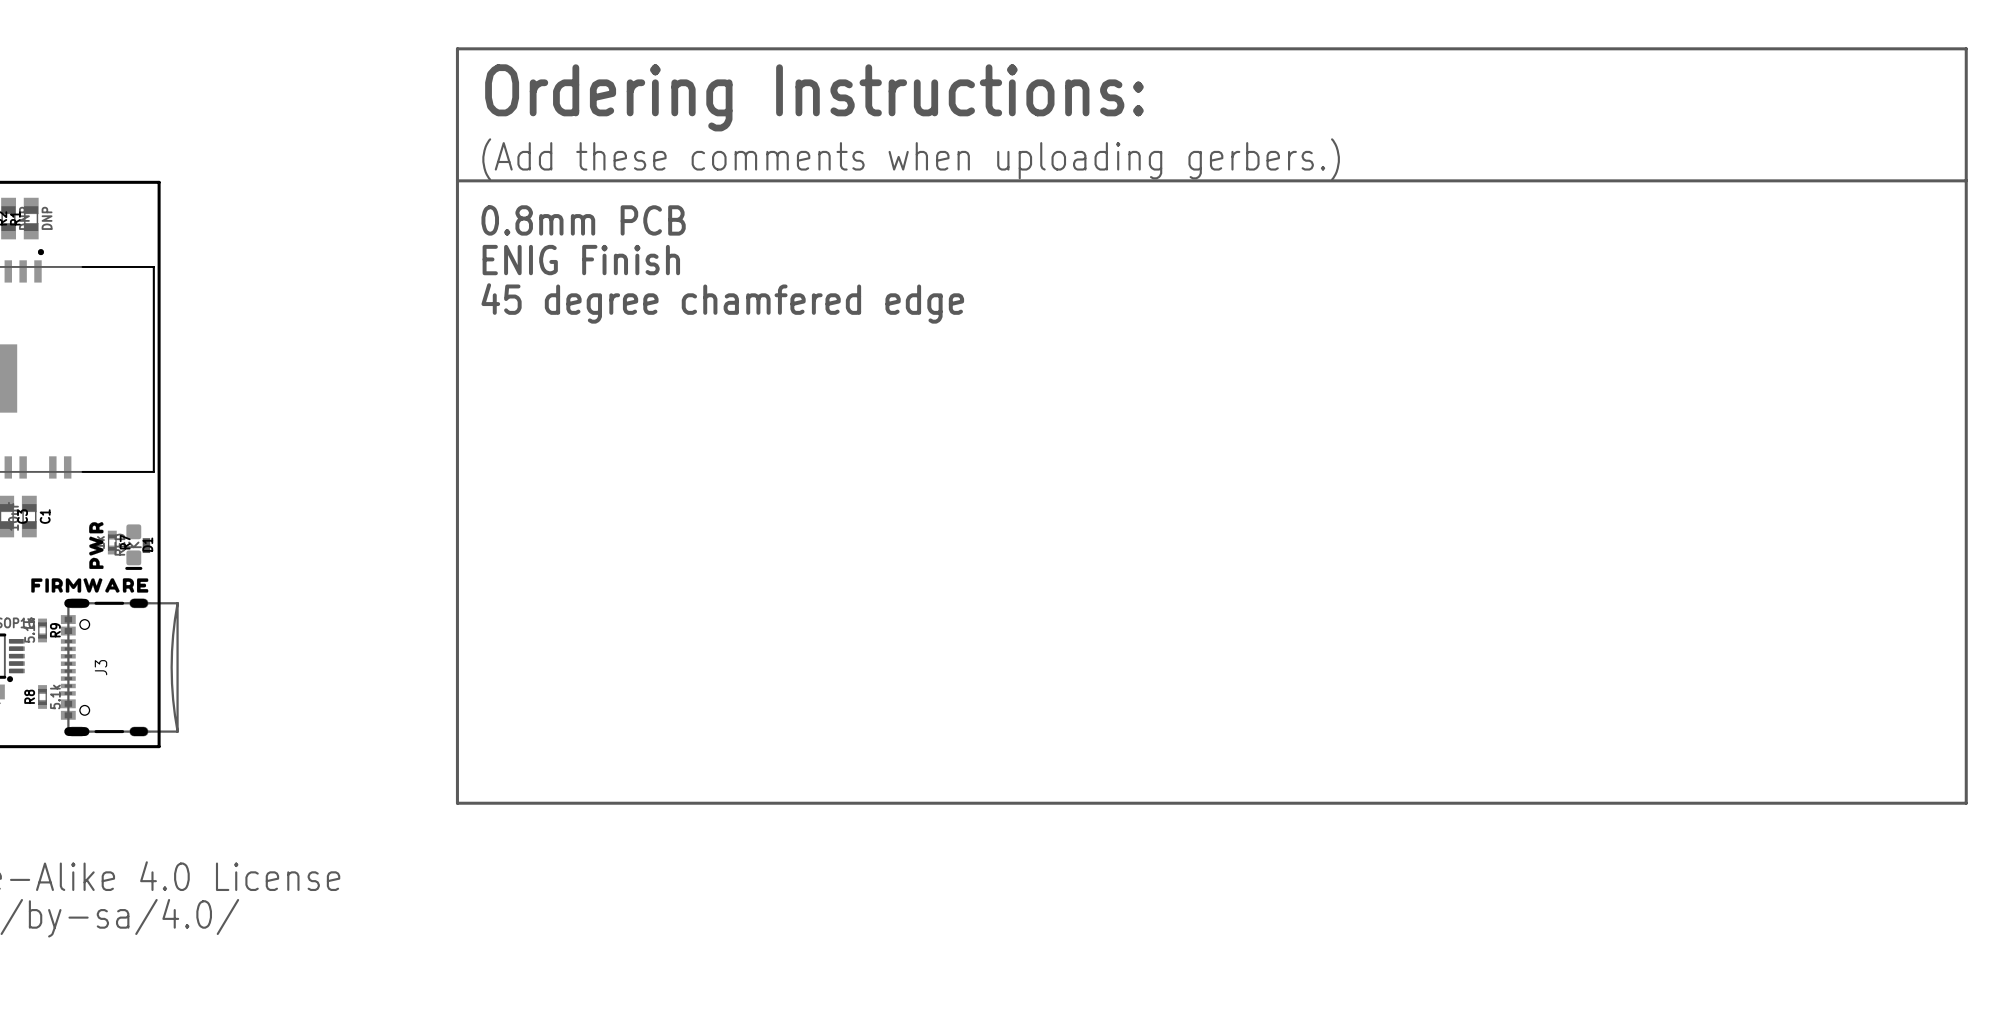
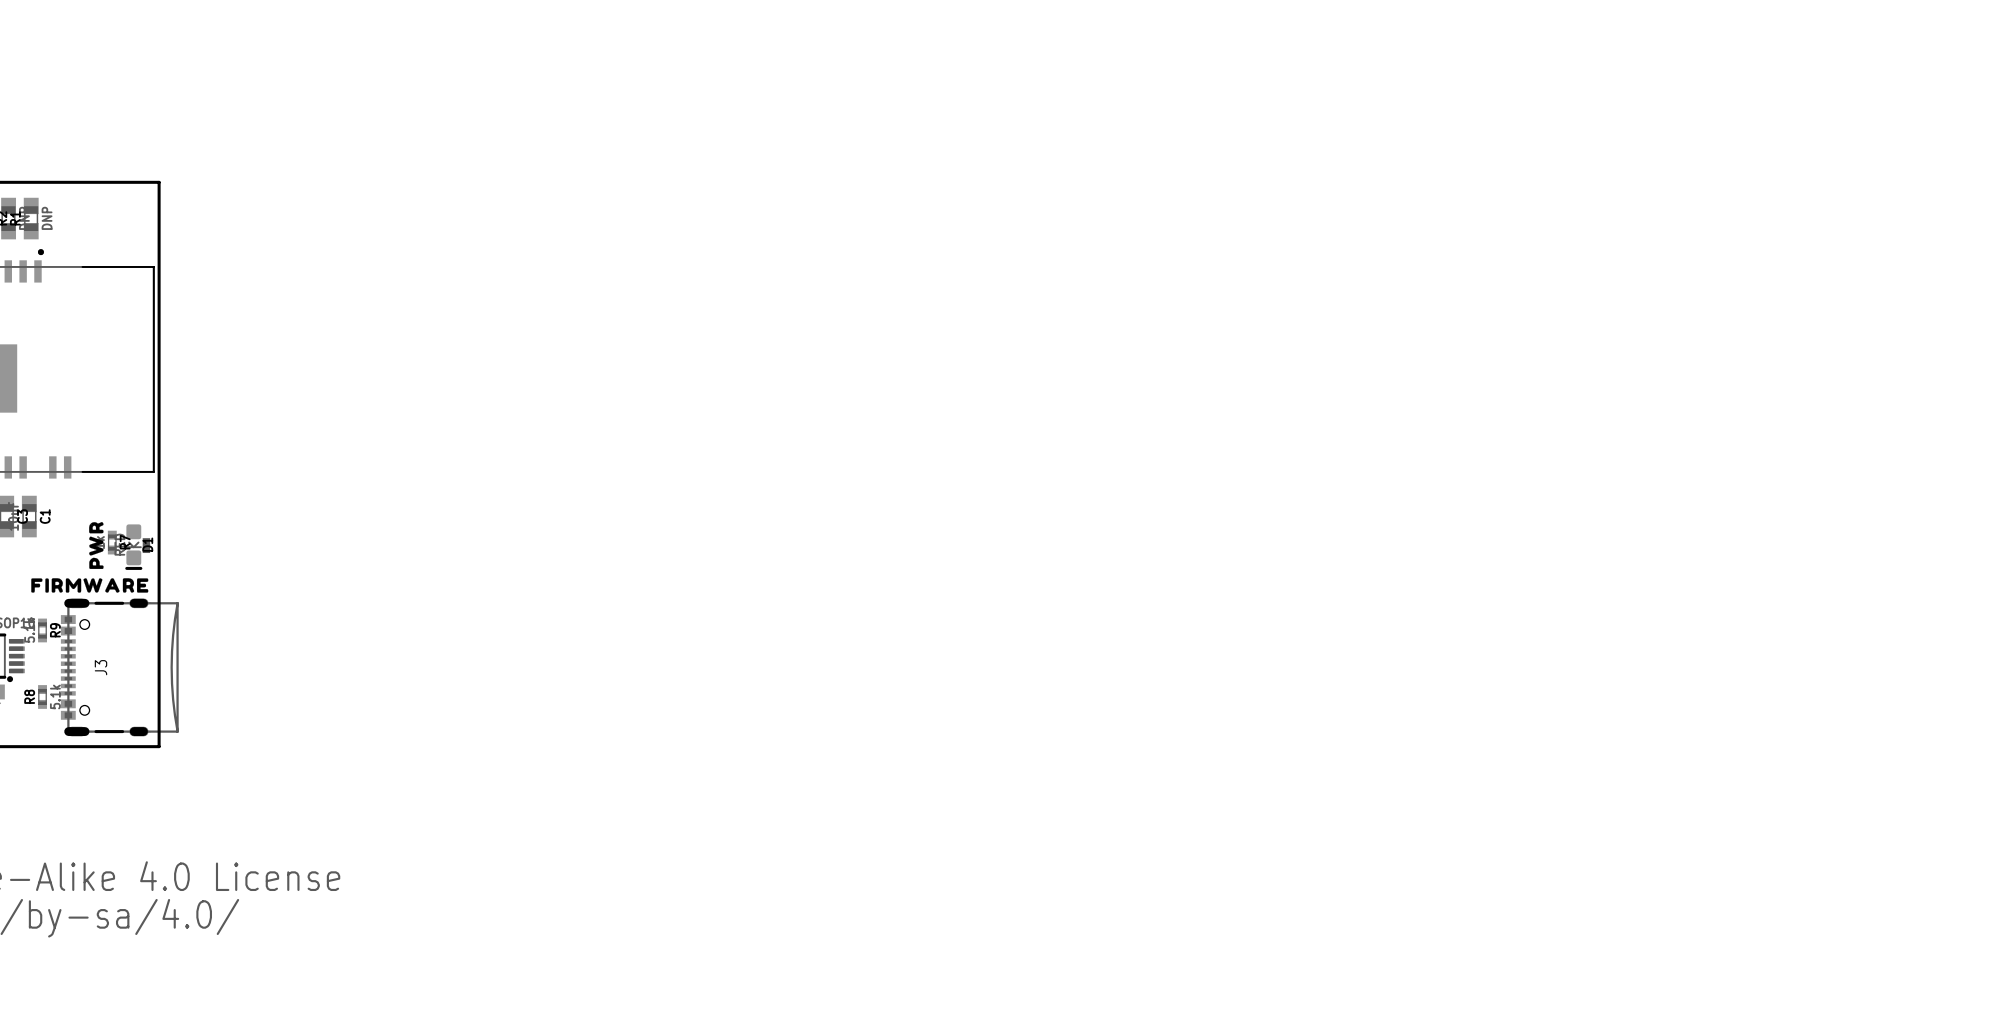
drawing: [455, 47, 1968, 805] -> none
text: 0.8mm PCB (583, 220) -> none
text: ENIG Finish (581, 260) -> none
text: 45 degree chamfered edge (722, 303) -> none

